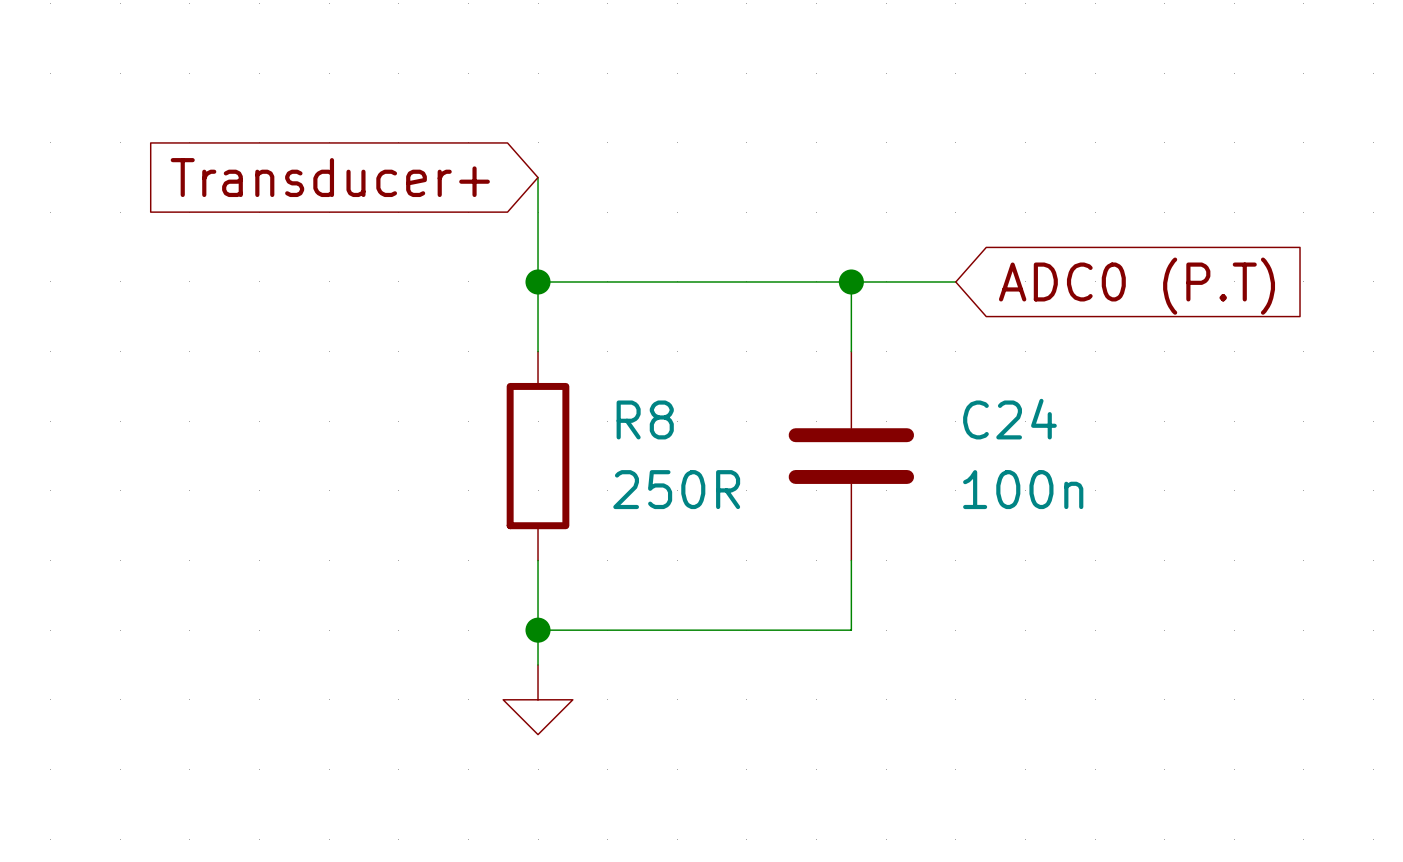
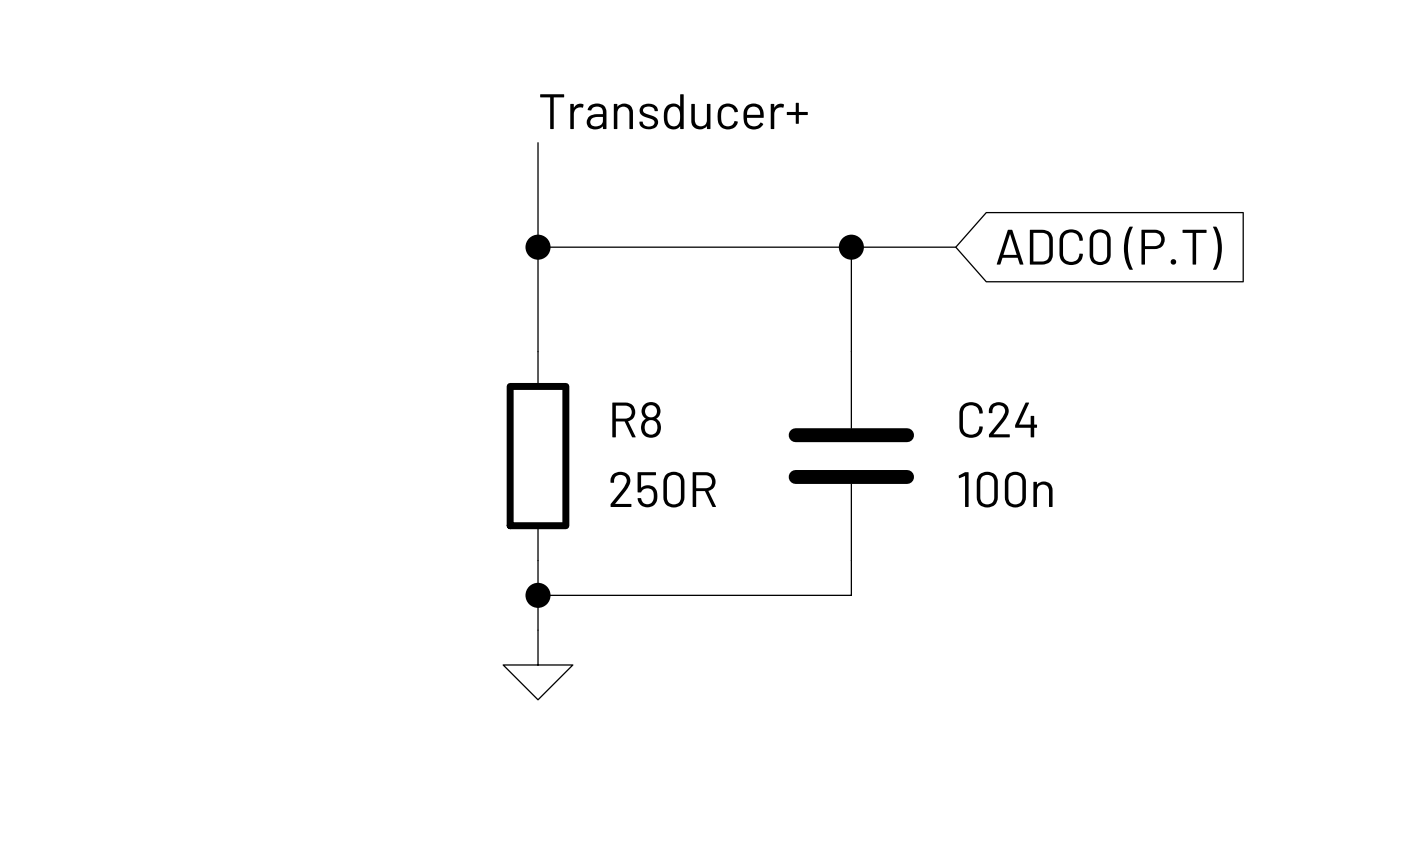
label: none -> Transducer+ (673, 111)
wire: none -> (538, 142) (538, 177)
global label: Transducer+ (330, 177) -> none
wire: none -> (851, 247) (851, 281)
wire: (538, 281) (955, 281) -> (538, 247) (955, 247)
junction position: (538, 281) -> (538, 247)
junction position: (851, 281) -> (851, 247)
global label position: ADC0 (P.T) (1136, 286) -> ADC0 (P.T) (1109, 248)
wire: (851, 595) (851, 630) (538, 630) (538, 664) -> (851, 595) (538, 595)
junction position: (538, 630) -> (538, 595)
power symbol position: (538, 699) -> (538, 664)

